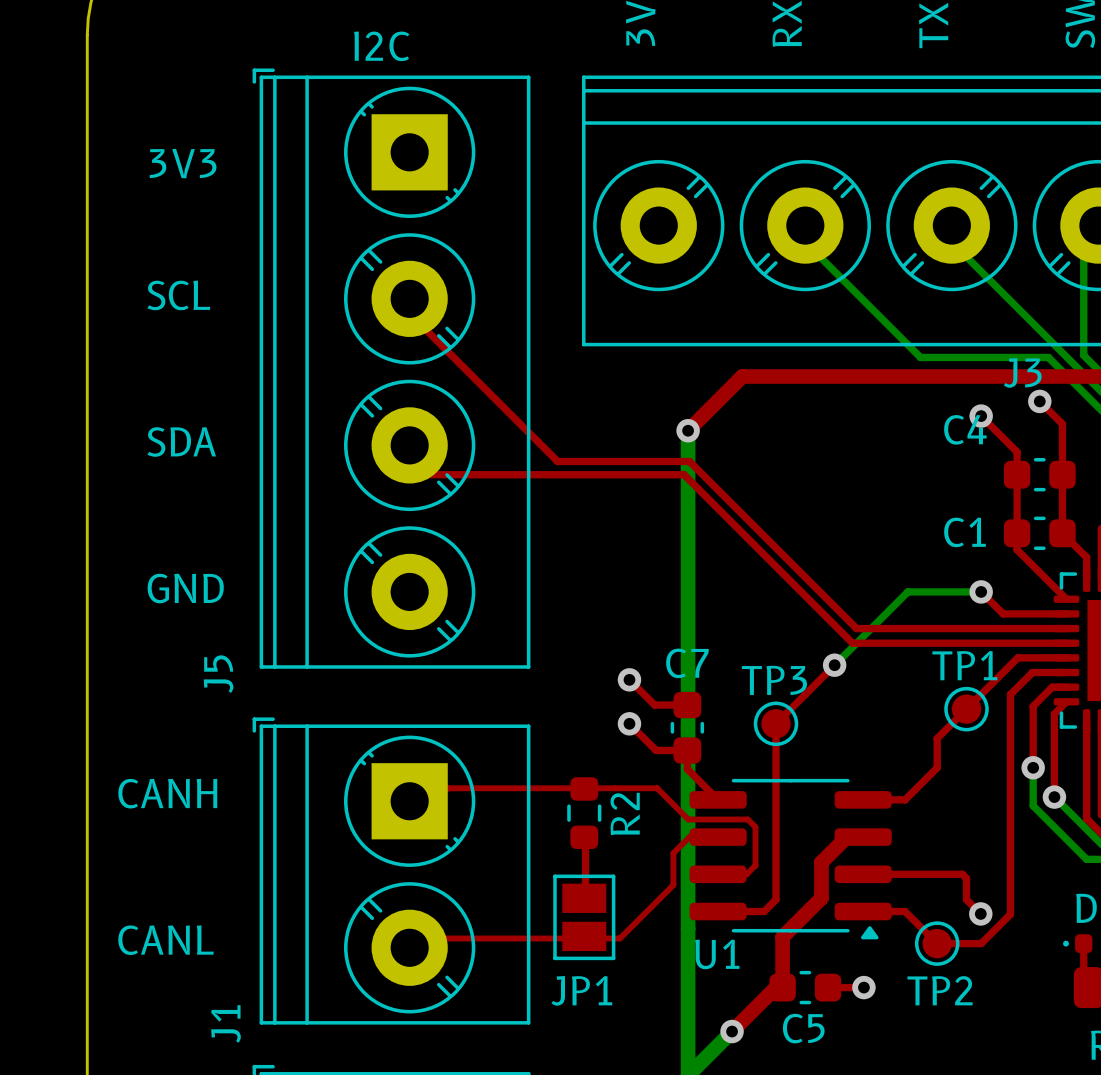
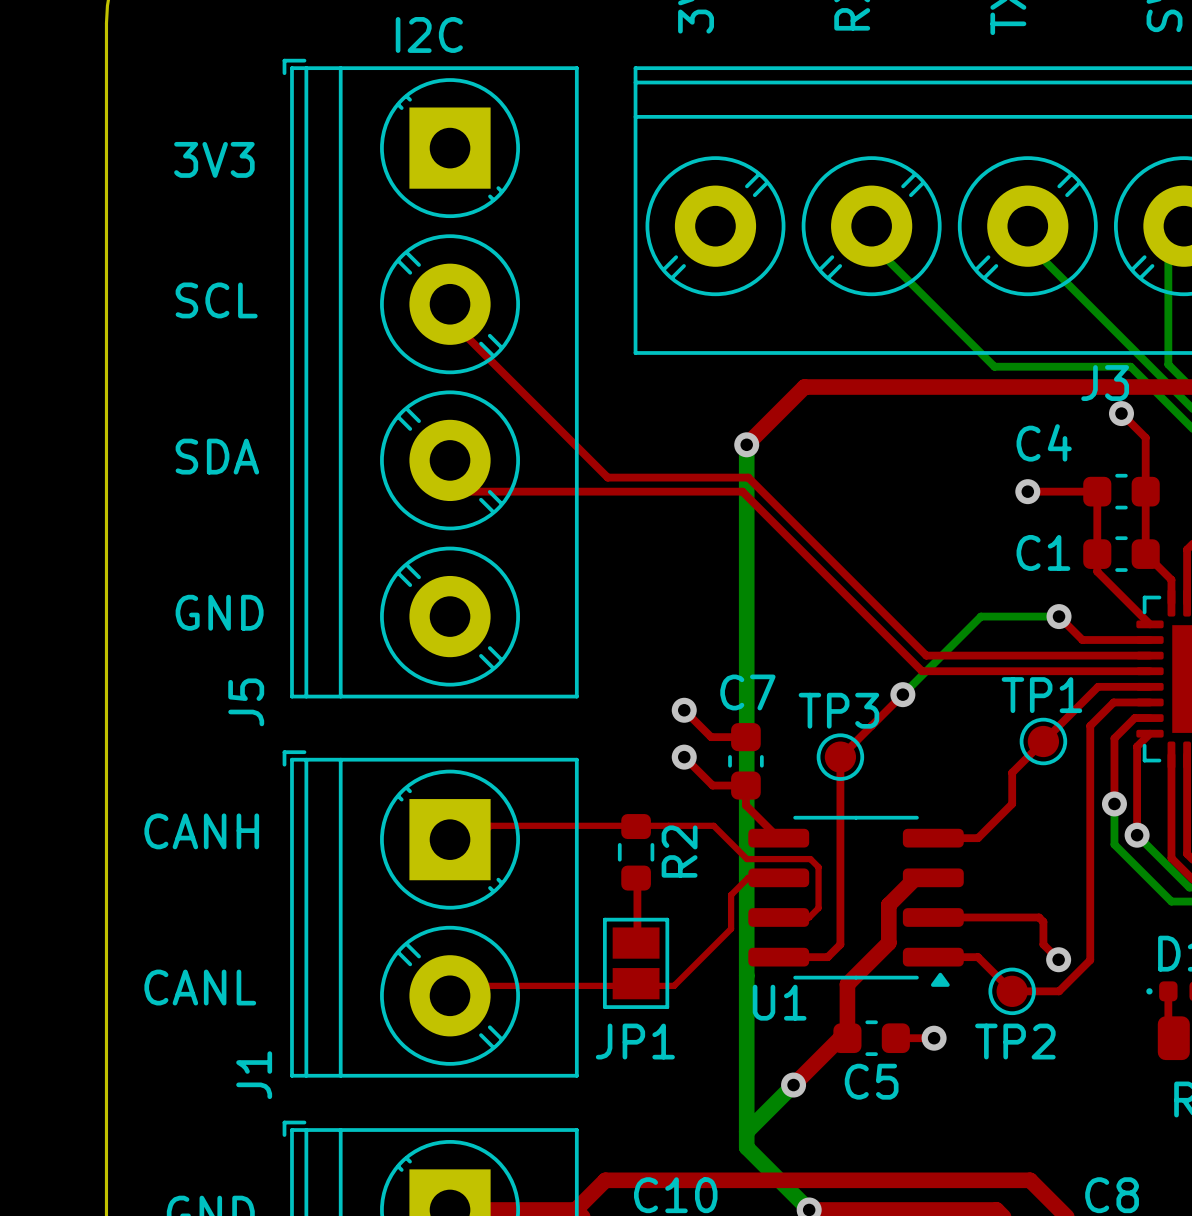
top track: (981, 416) (1017, 451) (1017, 474) -> (1027, 491) (1097, 491)
via position: (981, 416) -> (1027, 491)

